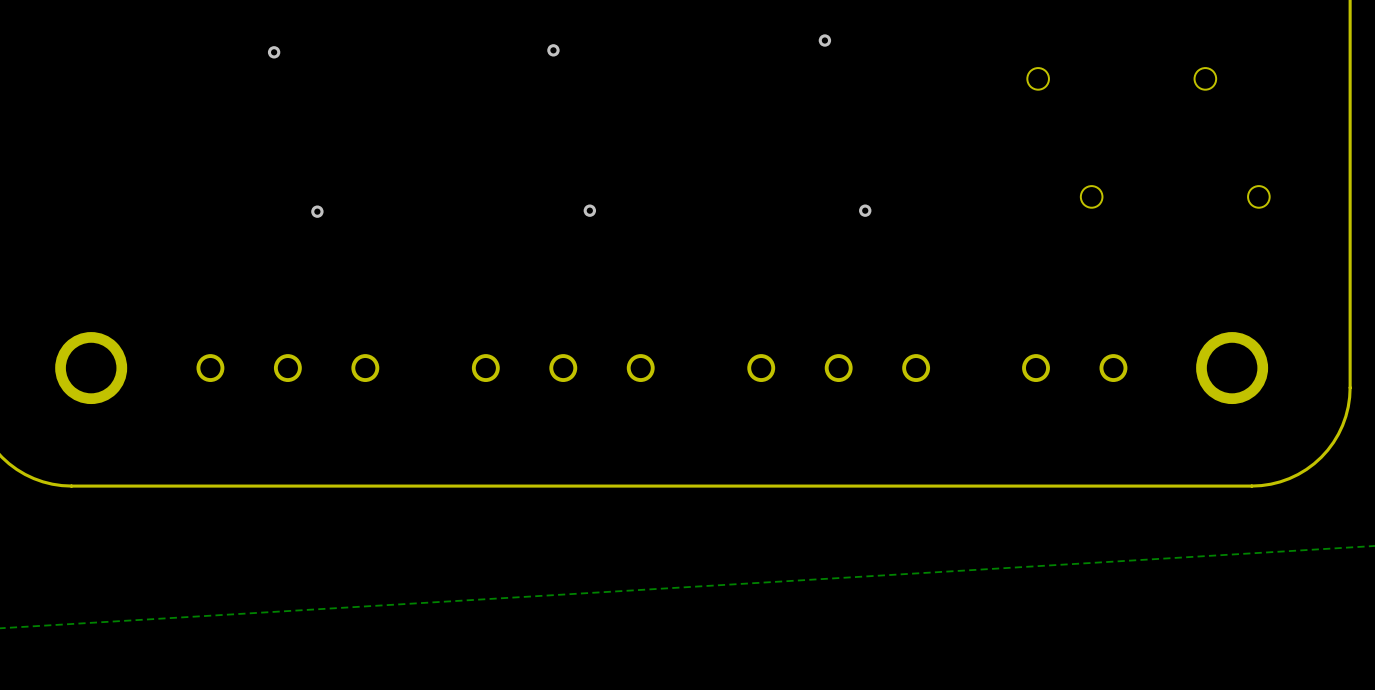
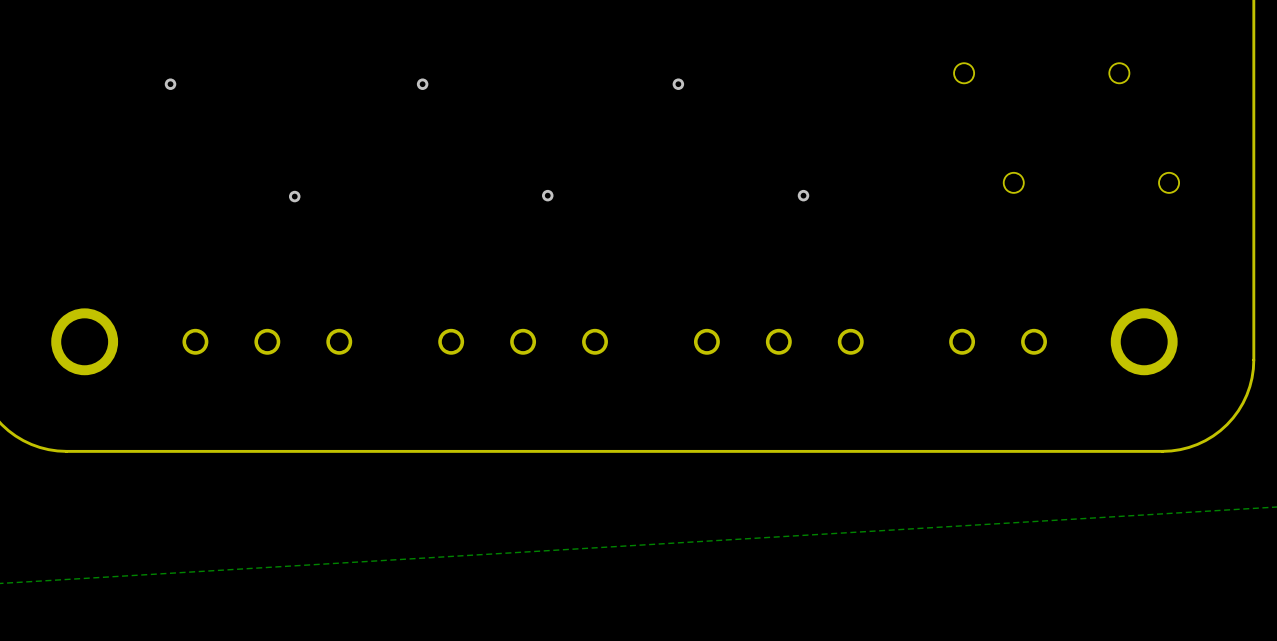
via: (824, 40) -> none
via: (553, 50) -> none
via: (274, 52) -> none
via: none -> (170, 84)
via: none -> (422, 84)
via: none -> (678, 84)

